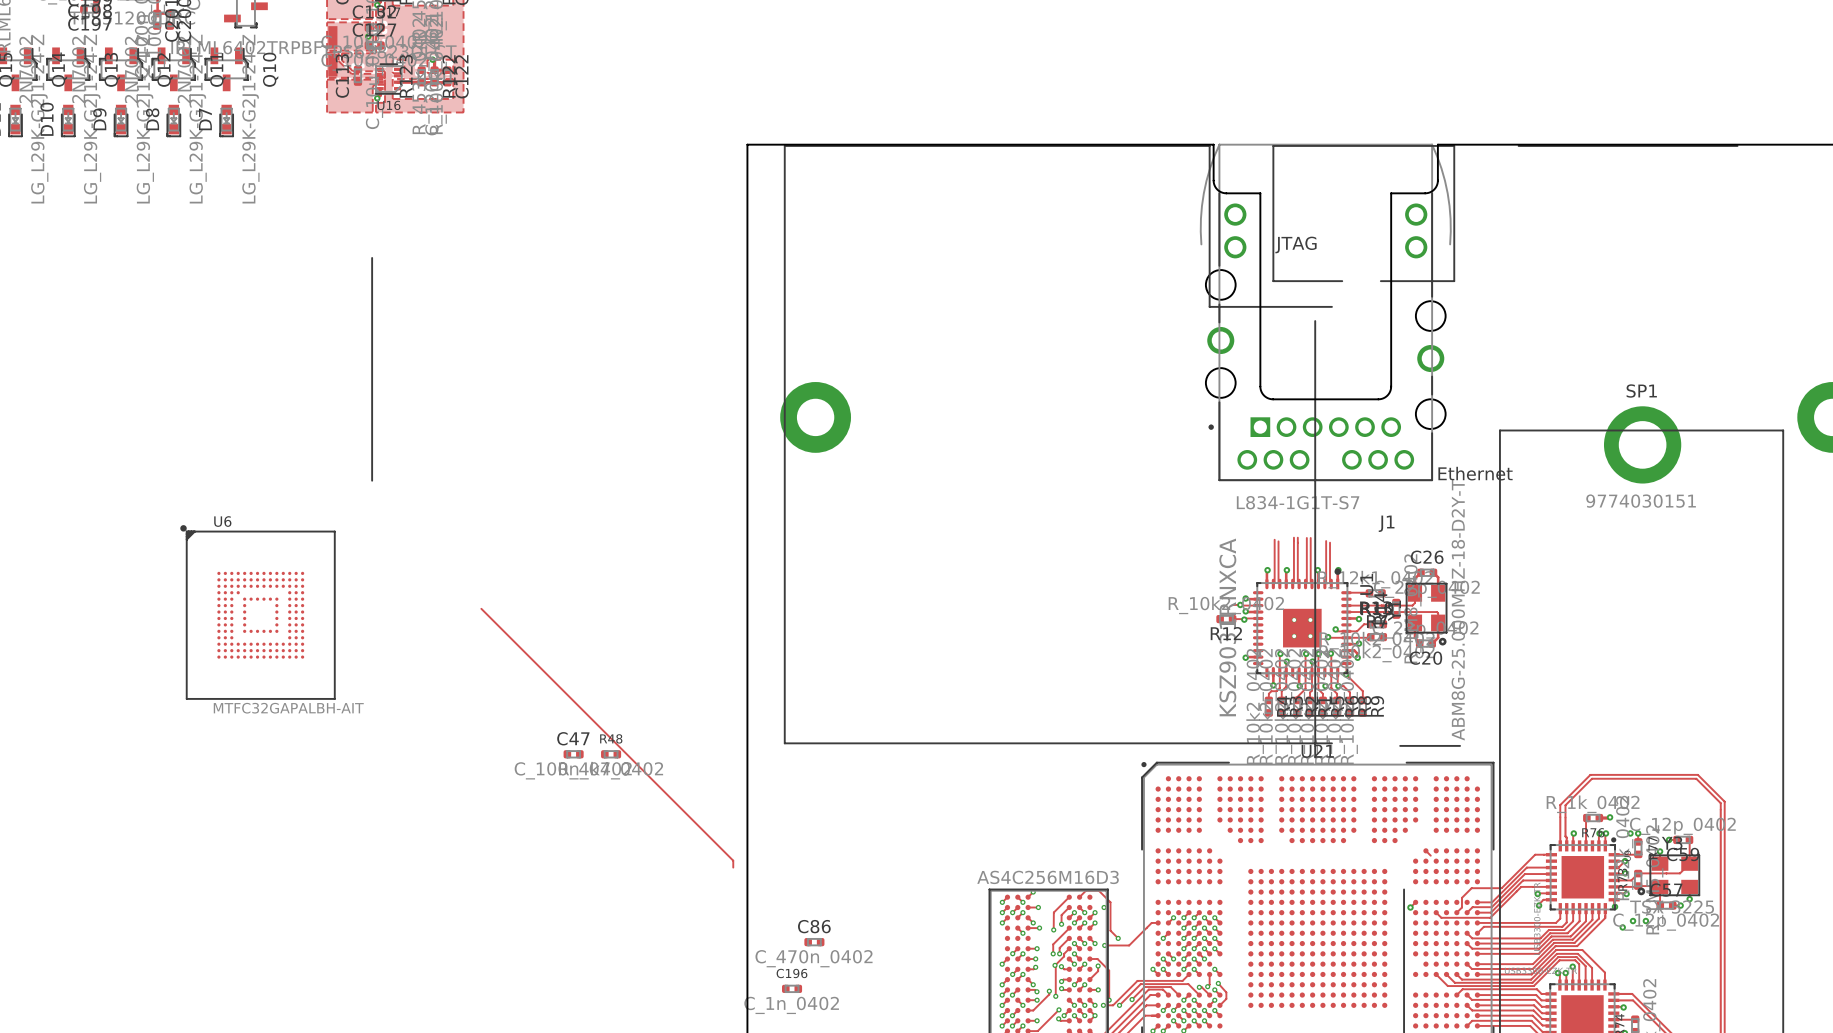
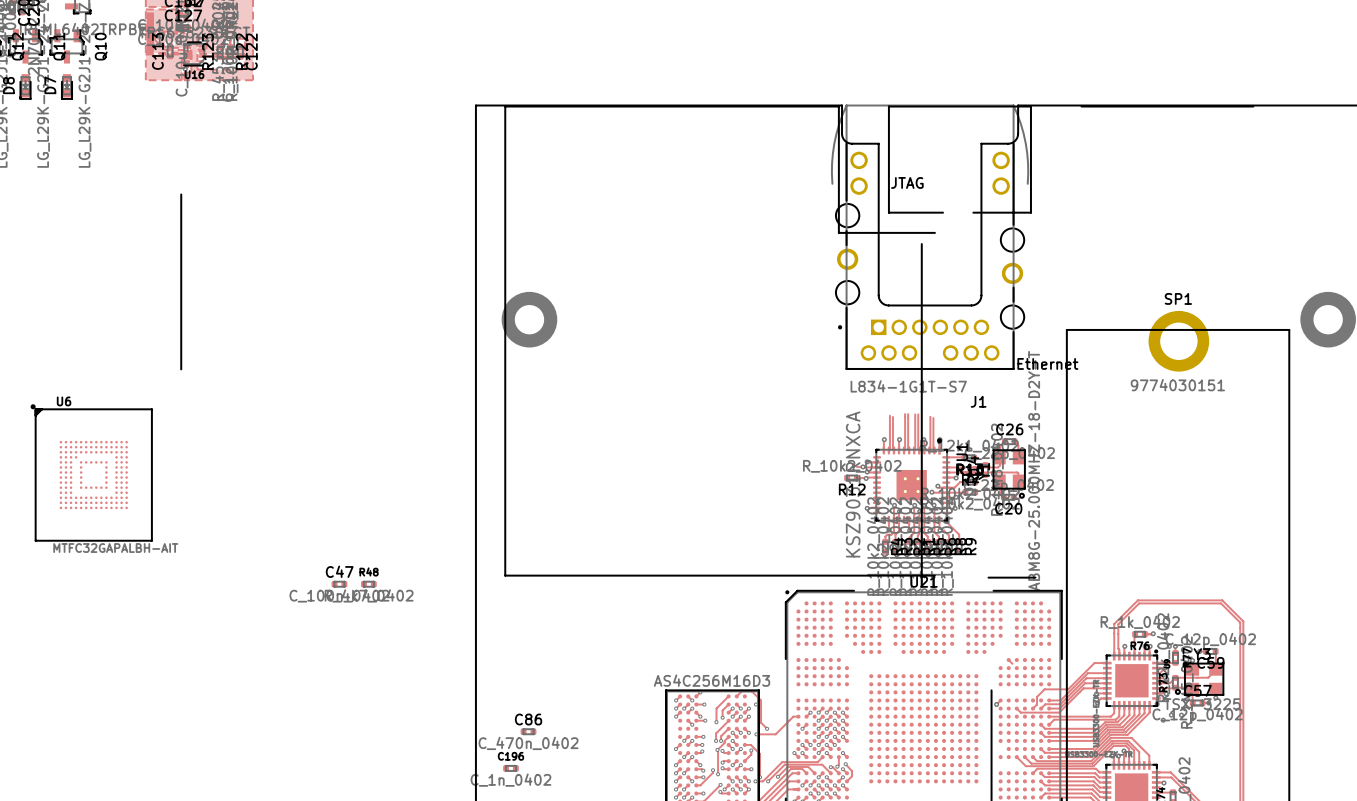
track: (481, 608) (733, 860) (733, 867) -> none

